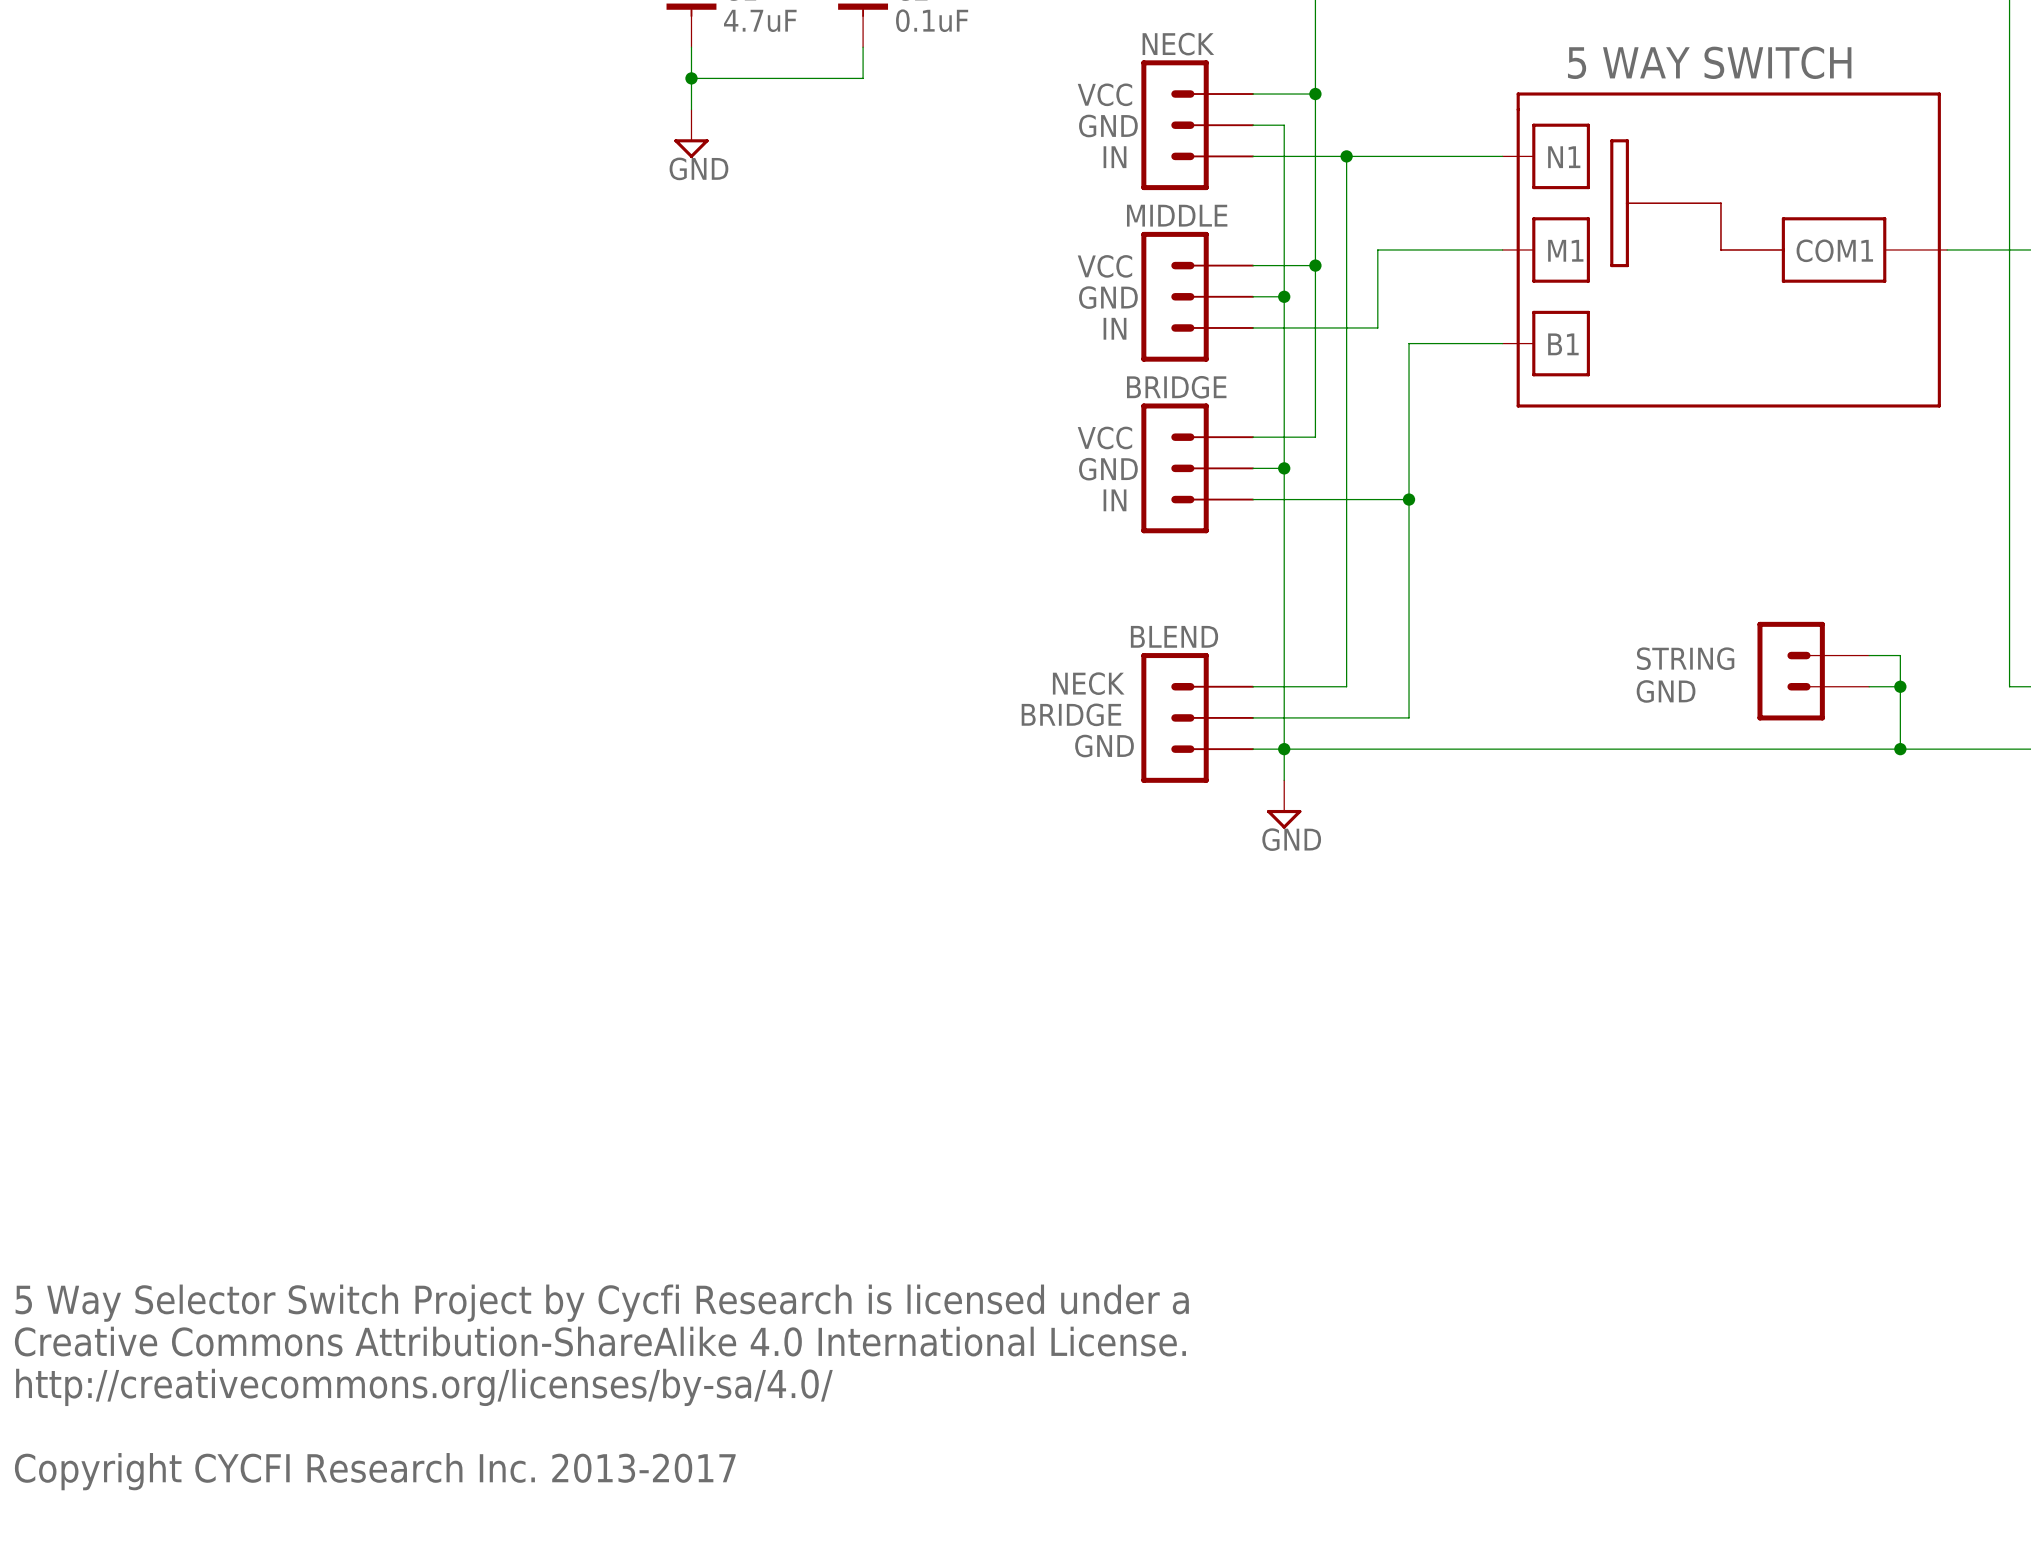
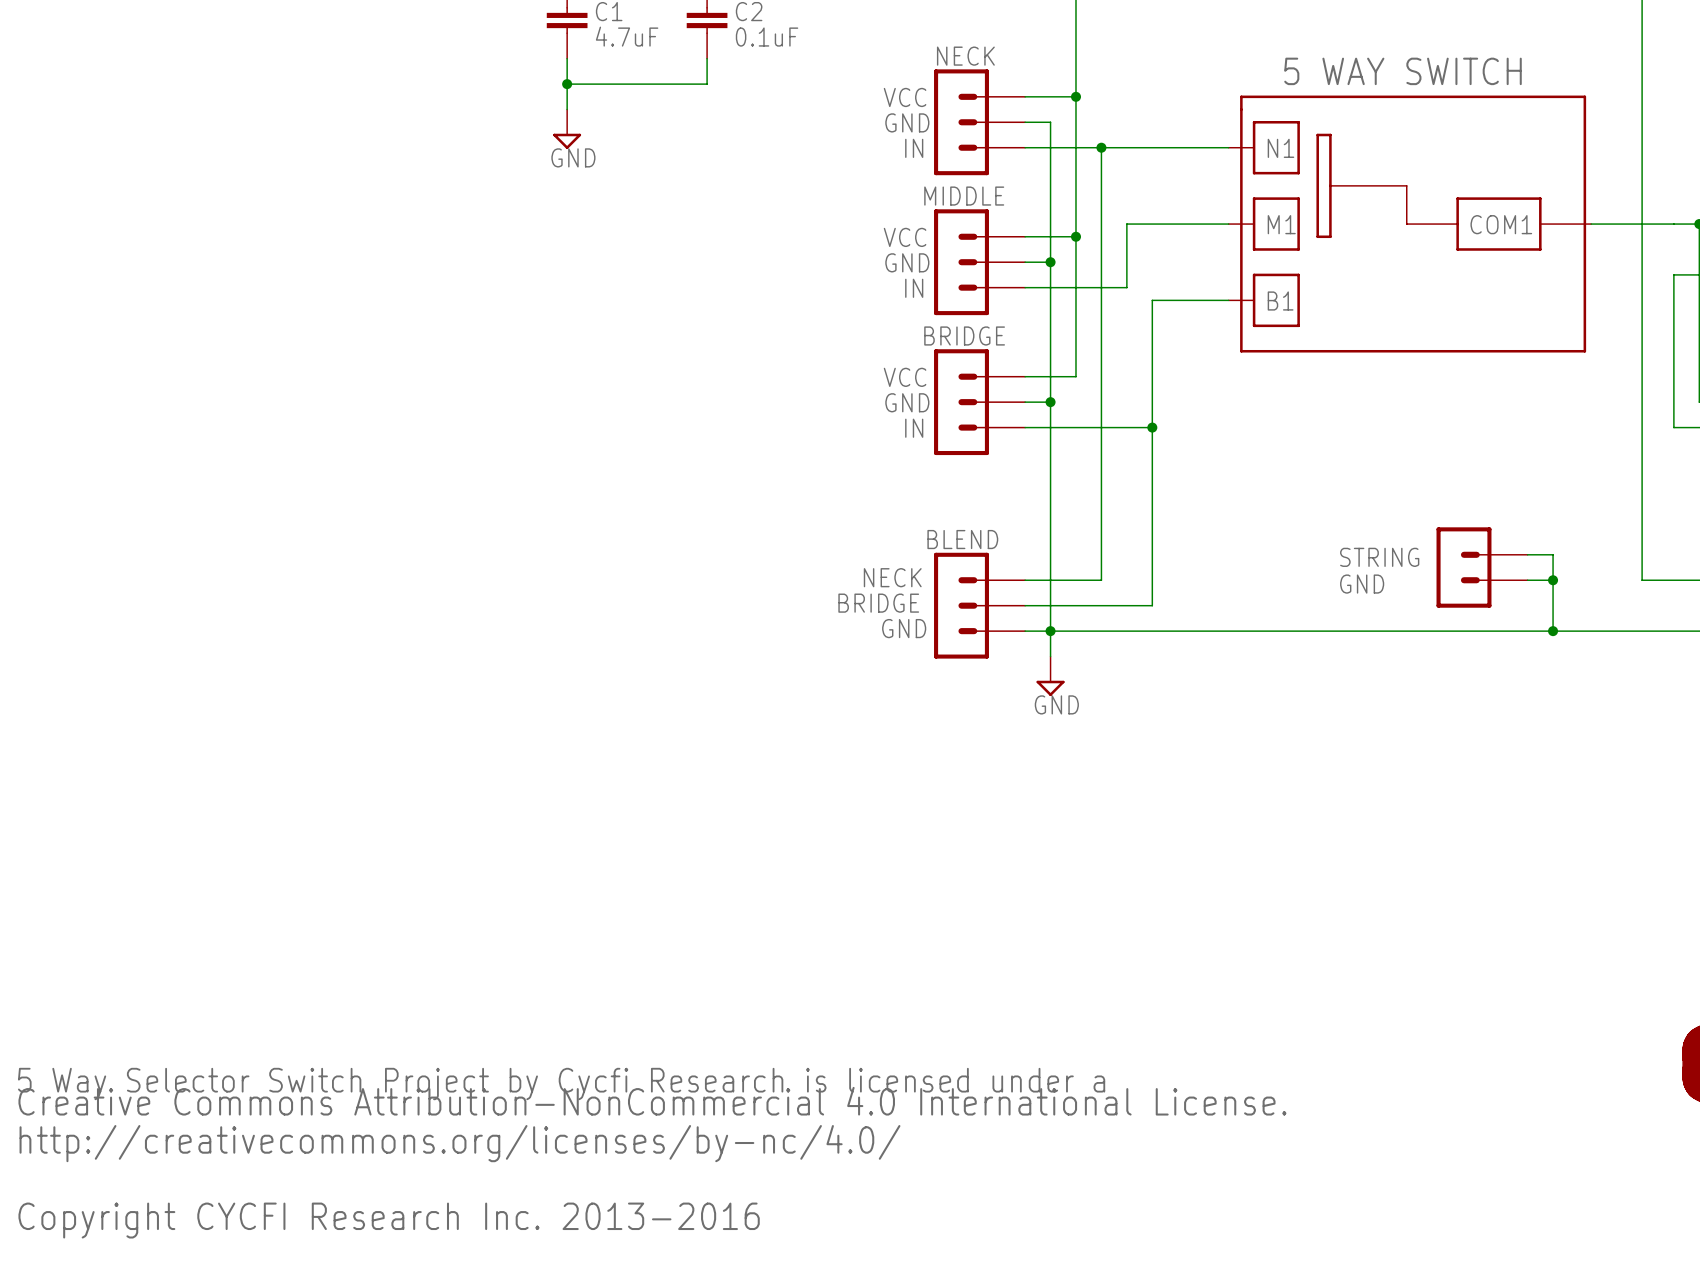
text: Creative Commons Attribution-ShareAlike 4.0 International License. (600, 1341) -> Creative Commons Attribution-NonCommercial 4.0 International License. (652, 1101)
text: http://creativecommons.org/licenses/by-sa/4.0/ (424, 1387) -> http://creativecommons.org/licenses/by-nc/4.0/ (459, 1143)
text: Copyright CYCFI Research Inc. 2013-2017 (375, 1471) -> Copyright CYCFI Research Inc. 2013-2016 (389, 1220)

